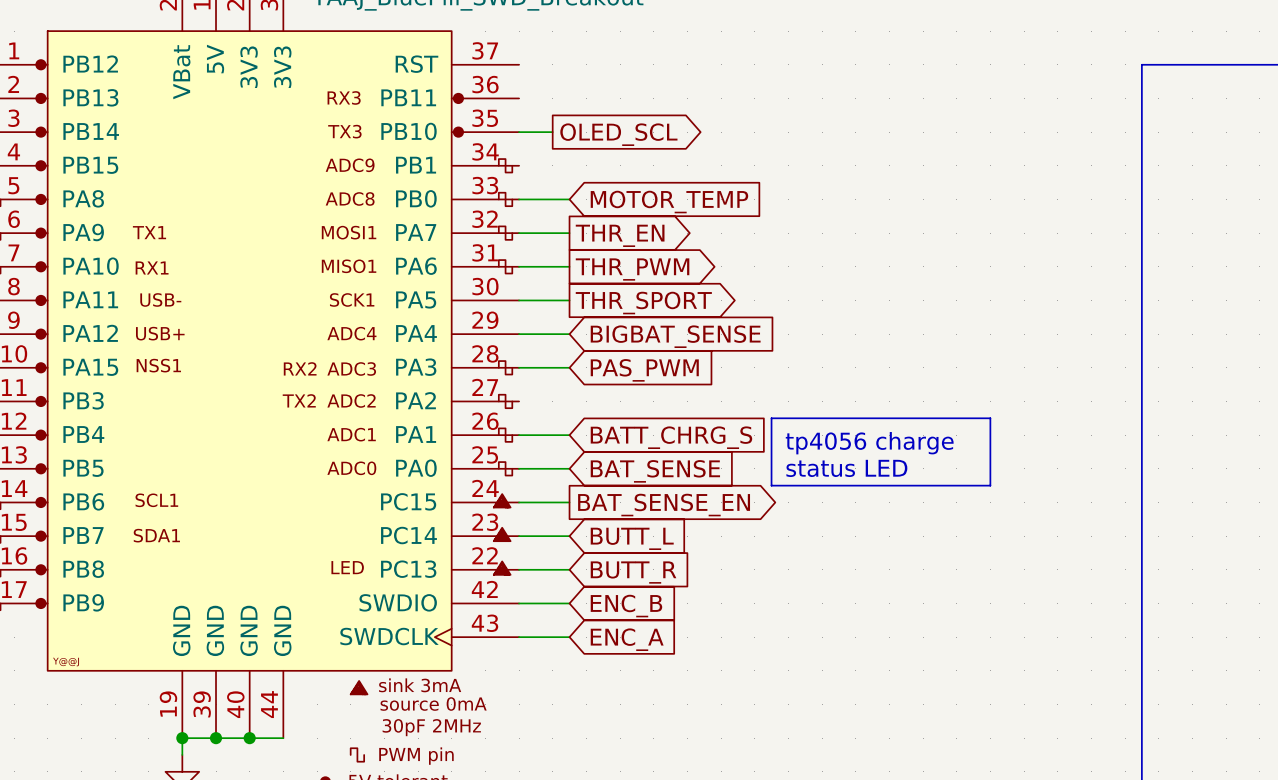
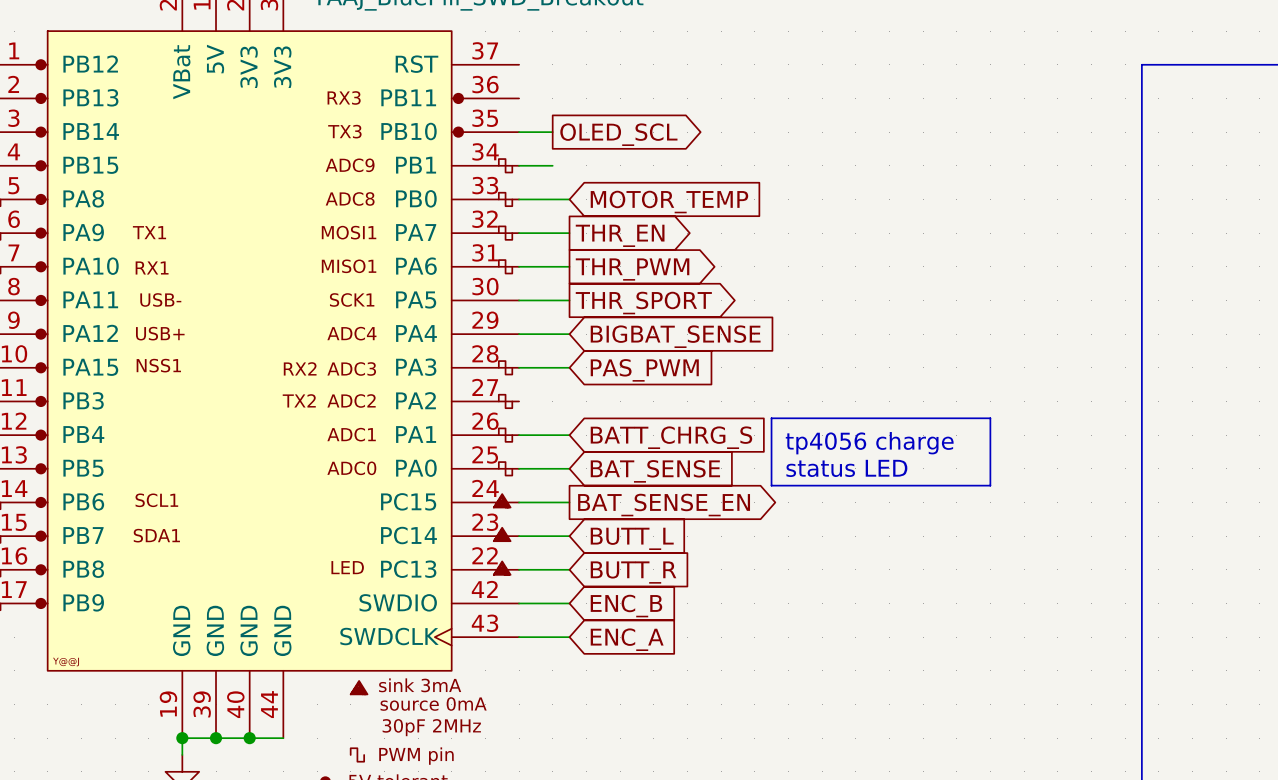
wire: none -> (519, 165) (552, 165)

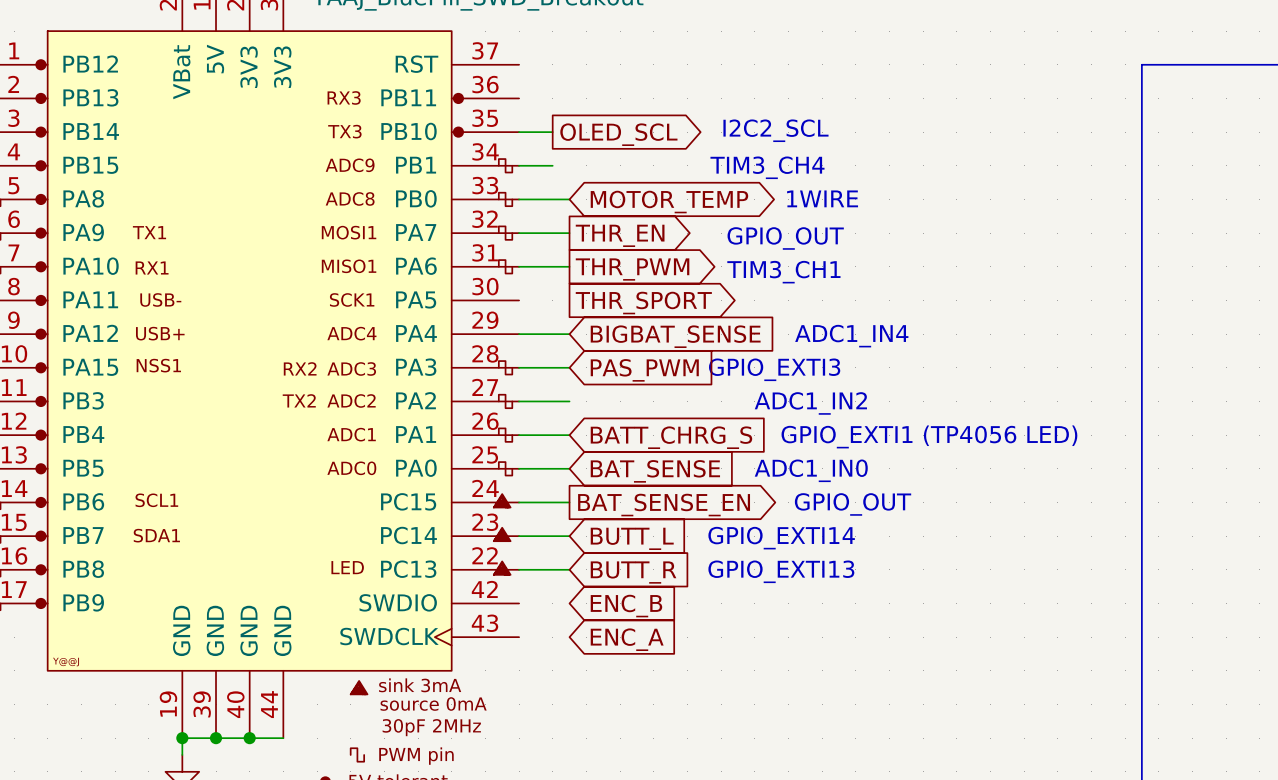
text: none -> I2C2_SCL (775, 130)
text: none -> TIM3_CH4 (767, 167)
text: none -> 1WIRE (822, 198)
global label shape: input (669, 202) -> bidirectional (669, 202)
text: none -> GPIO_OUT (785, 238)
text: none -> TIM3_CH1 (783, 272)
wire: (519, 300) (569, 300) -> (519, 401) (569, 401)
text: none -> ADC1_IN4 (851, 336)
text: none -> GPIO_EXTI3 (774, 369)
text: none -> ADC1_IN2 (810, 403)
line: (771, 418) (990, 418) (990, 485) (771, 485) (771, 418) -> none
text: none -> GPIO_EXTI1 (TP4056 LED) (929, 436)
text: tp4056 charge (869, 443) -> none
text: status LED (846, 468) -> none
text: none -> ADC1_IN0 (811, 470)
text: none -> GPIO_OUT (853, 504)
text: none -> GPIO_EXTI14 (781, 538)
text: none -> GPIO_EXTI13 (781, 571)
wire: (519, 603) (569, 603) -> none
wire: (519, 637) (569, 637) -> none

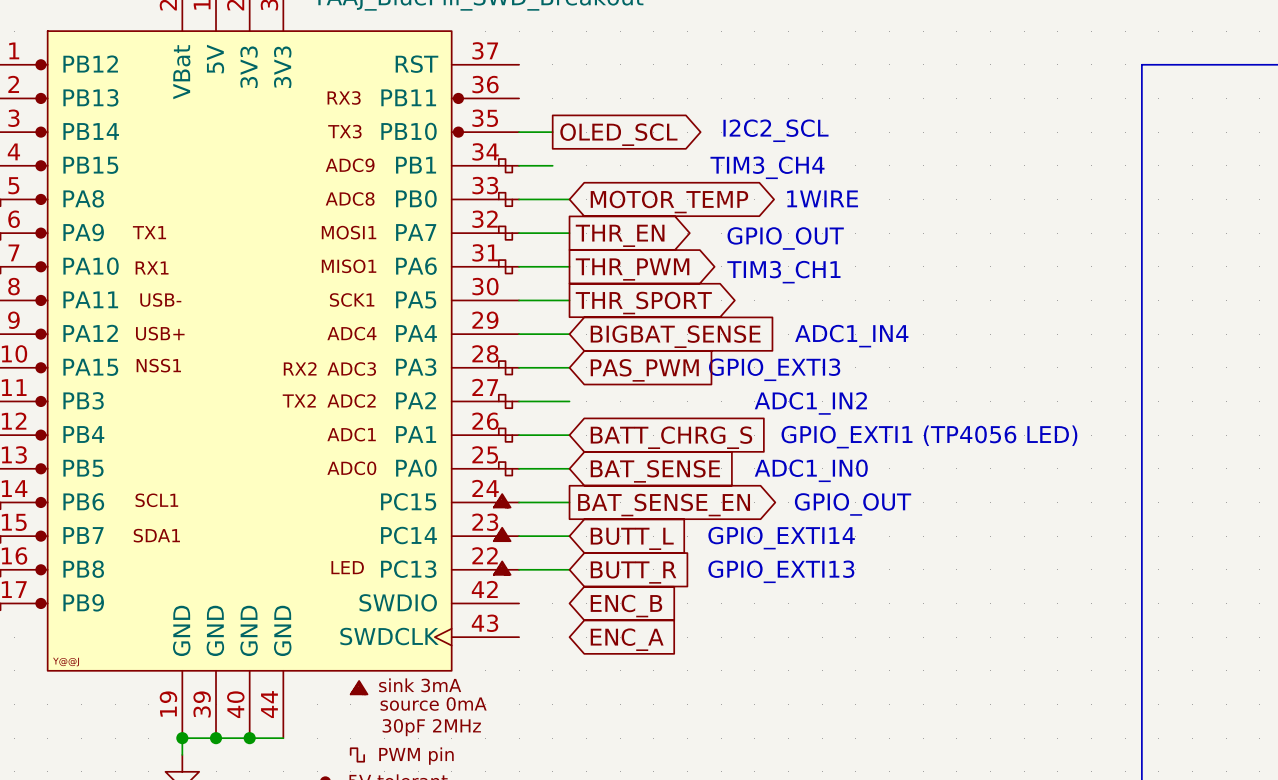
wire: none -> (519, 300) (569, 300)

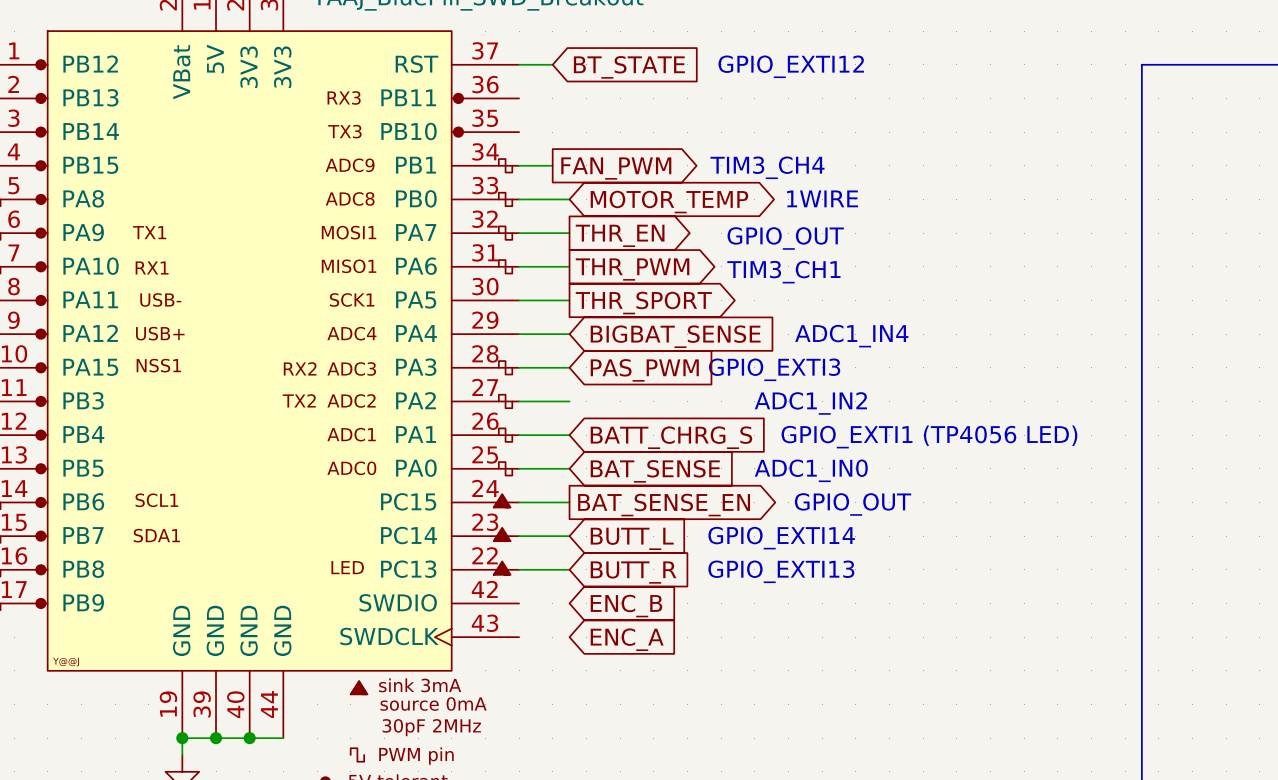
text: none -> GPIO_EXTI12 (791, 66)
global label: none -> BT_STATE (629, 67)
text: I2C2_SCL (775, 130) -> none
wire: (519, 132) (552, 132) -> (519, 64) (552, 64)
global label: OLED_SCL (618, 134) -> none
global label: none -> FAN_PWM (616, 168)

